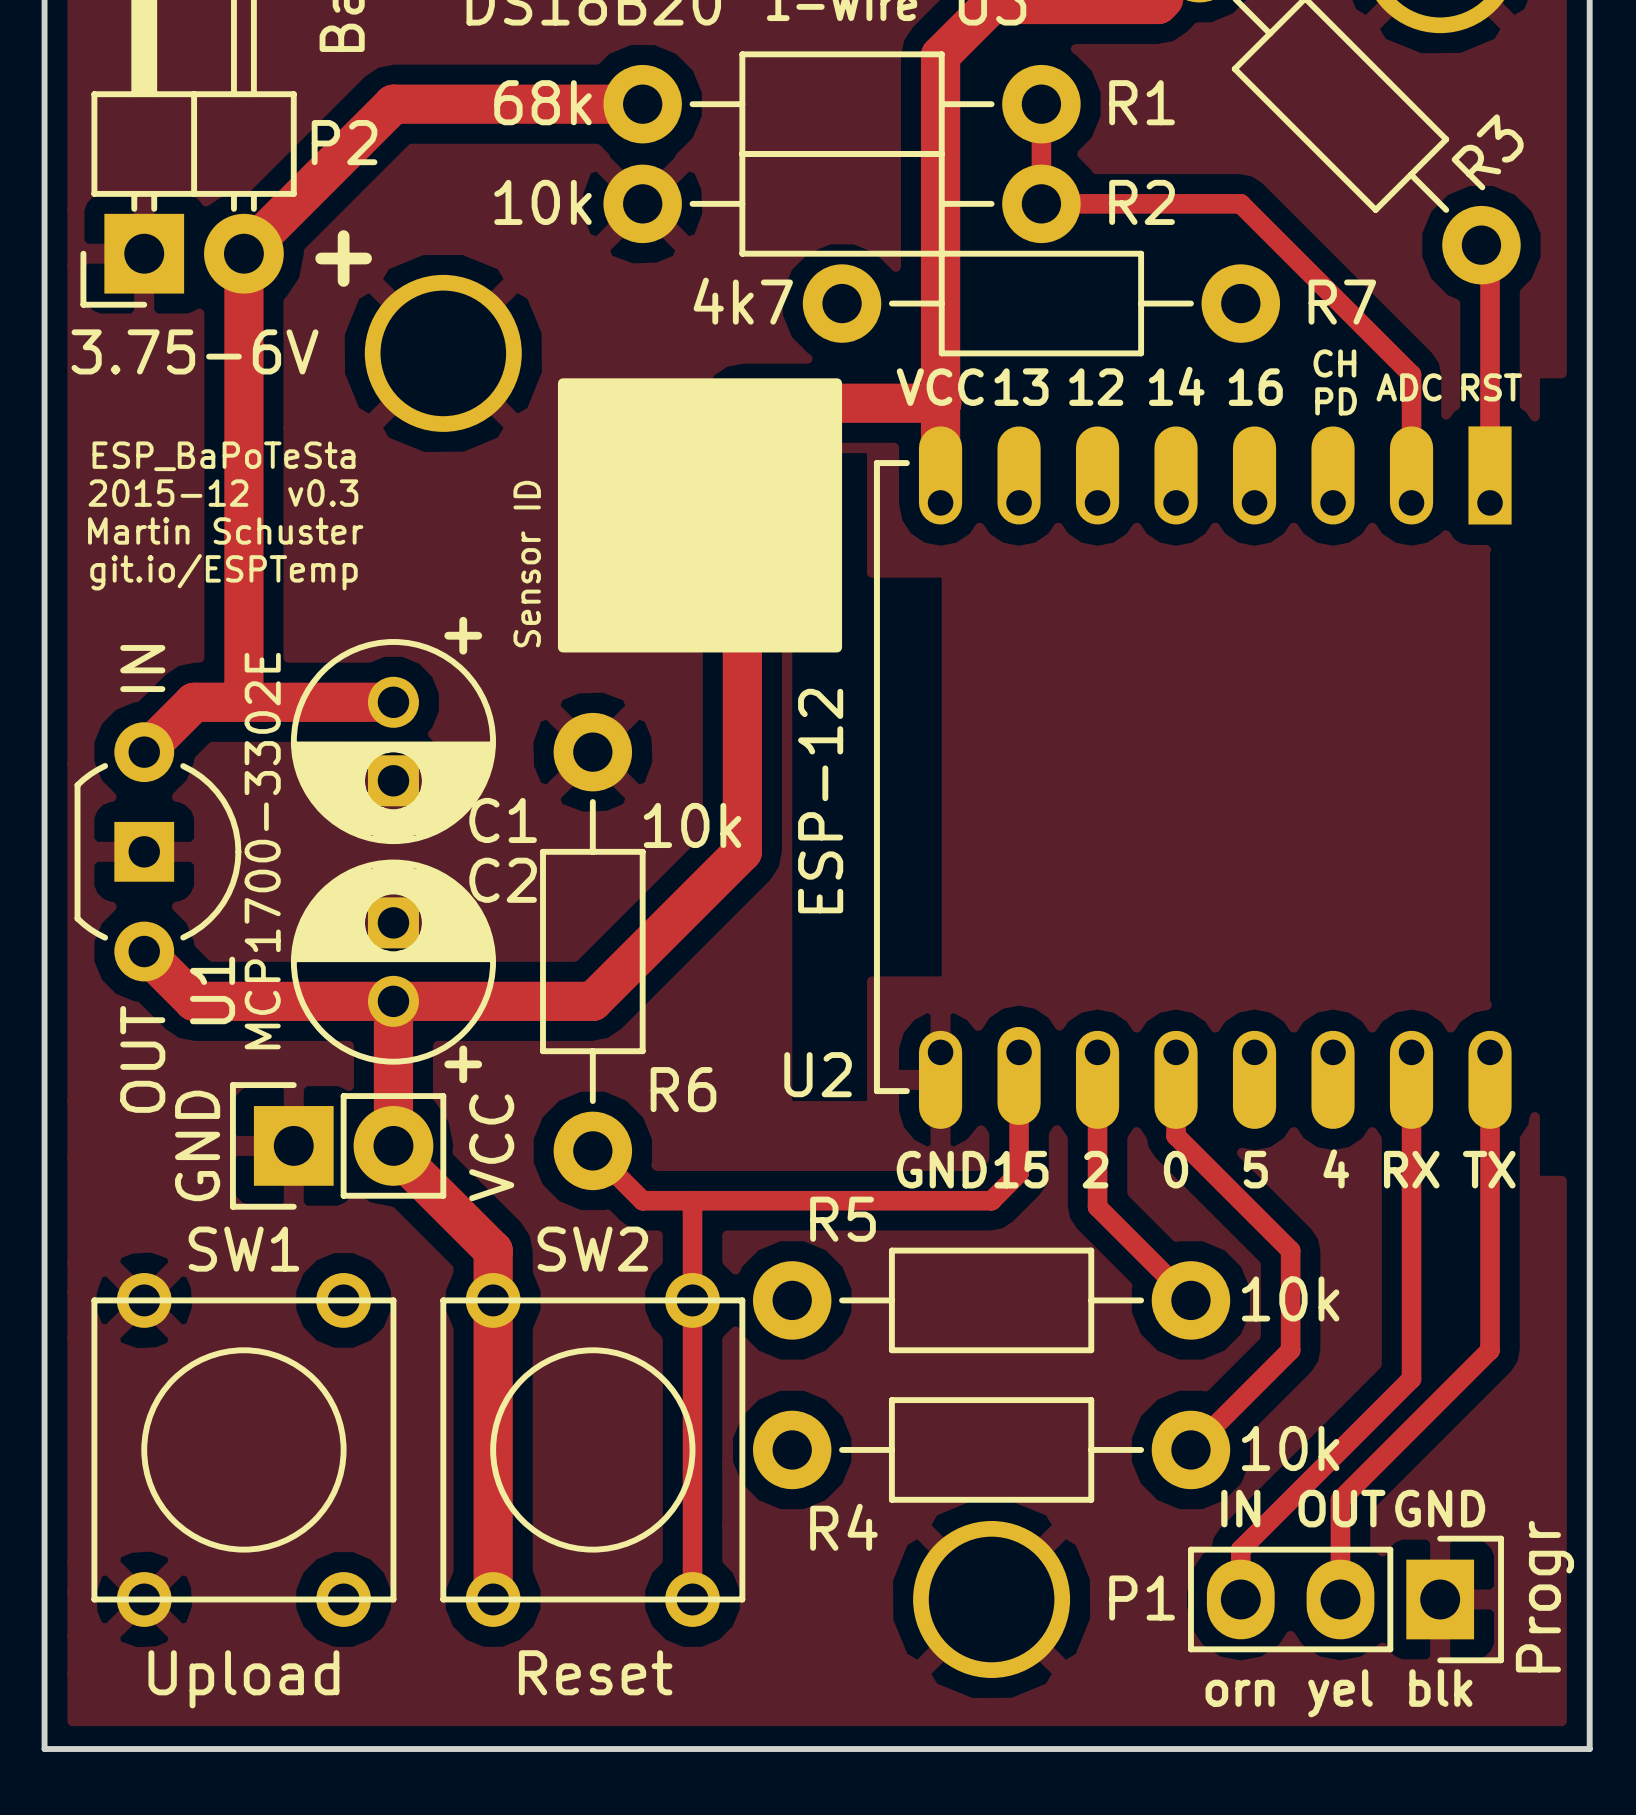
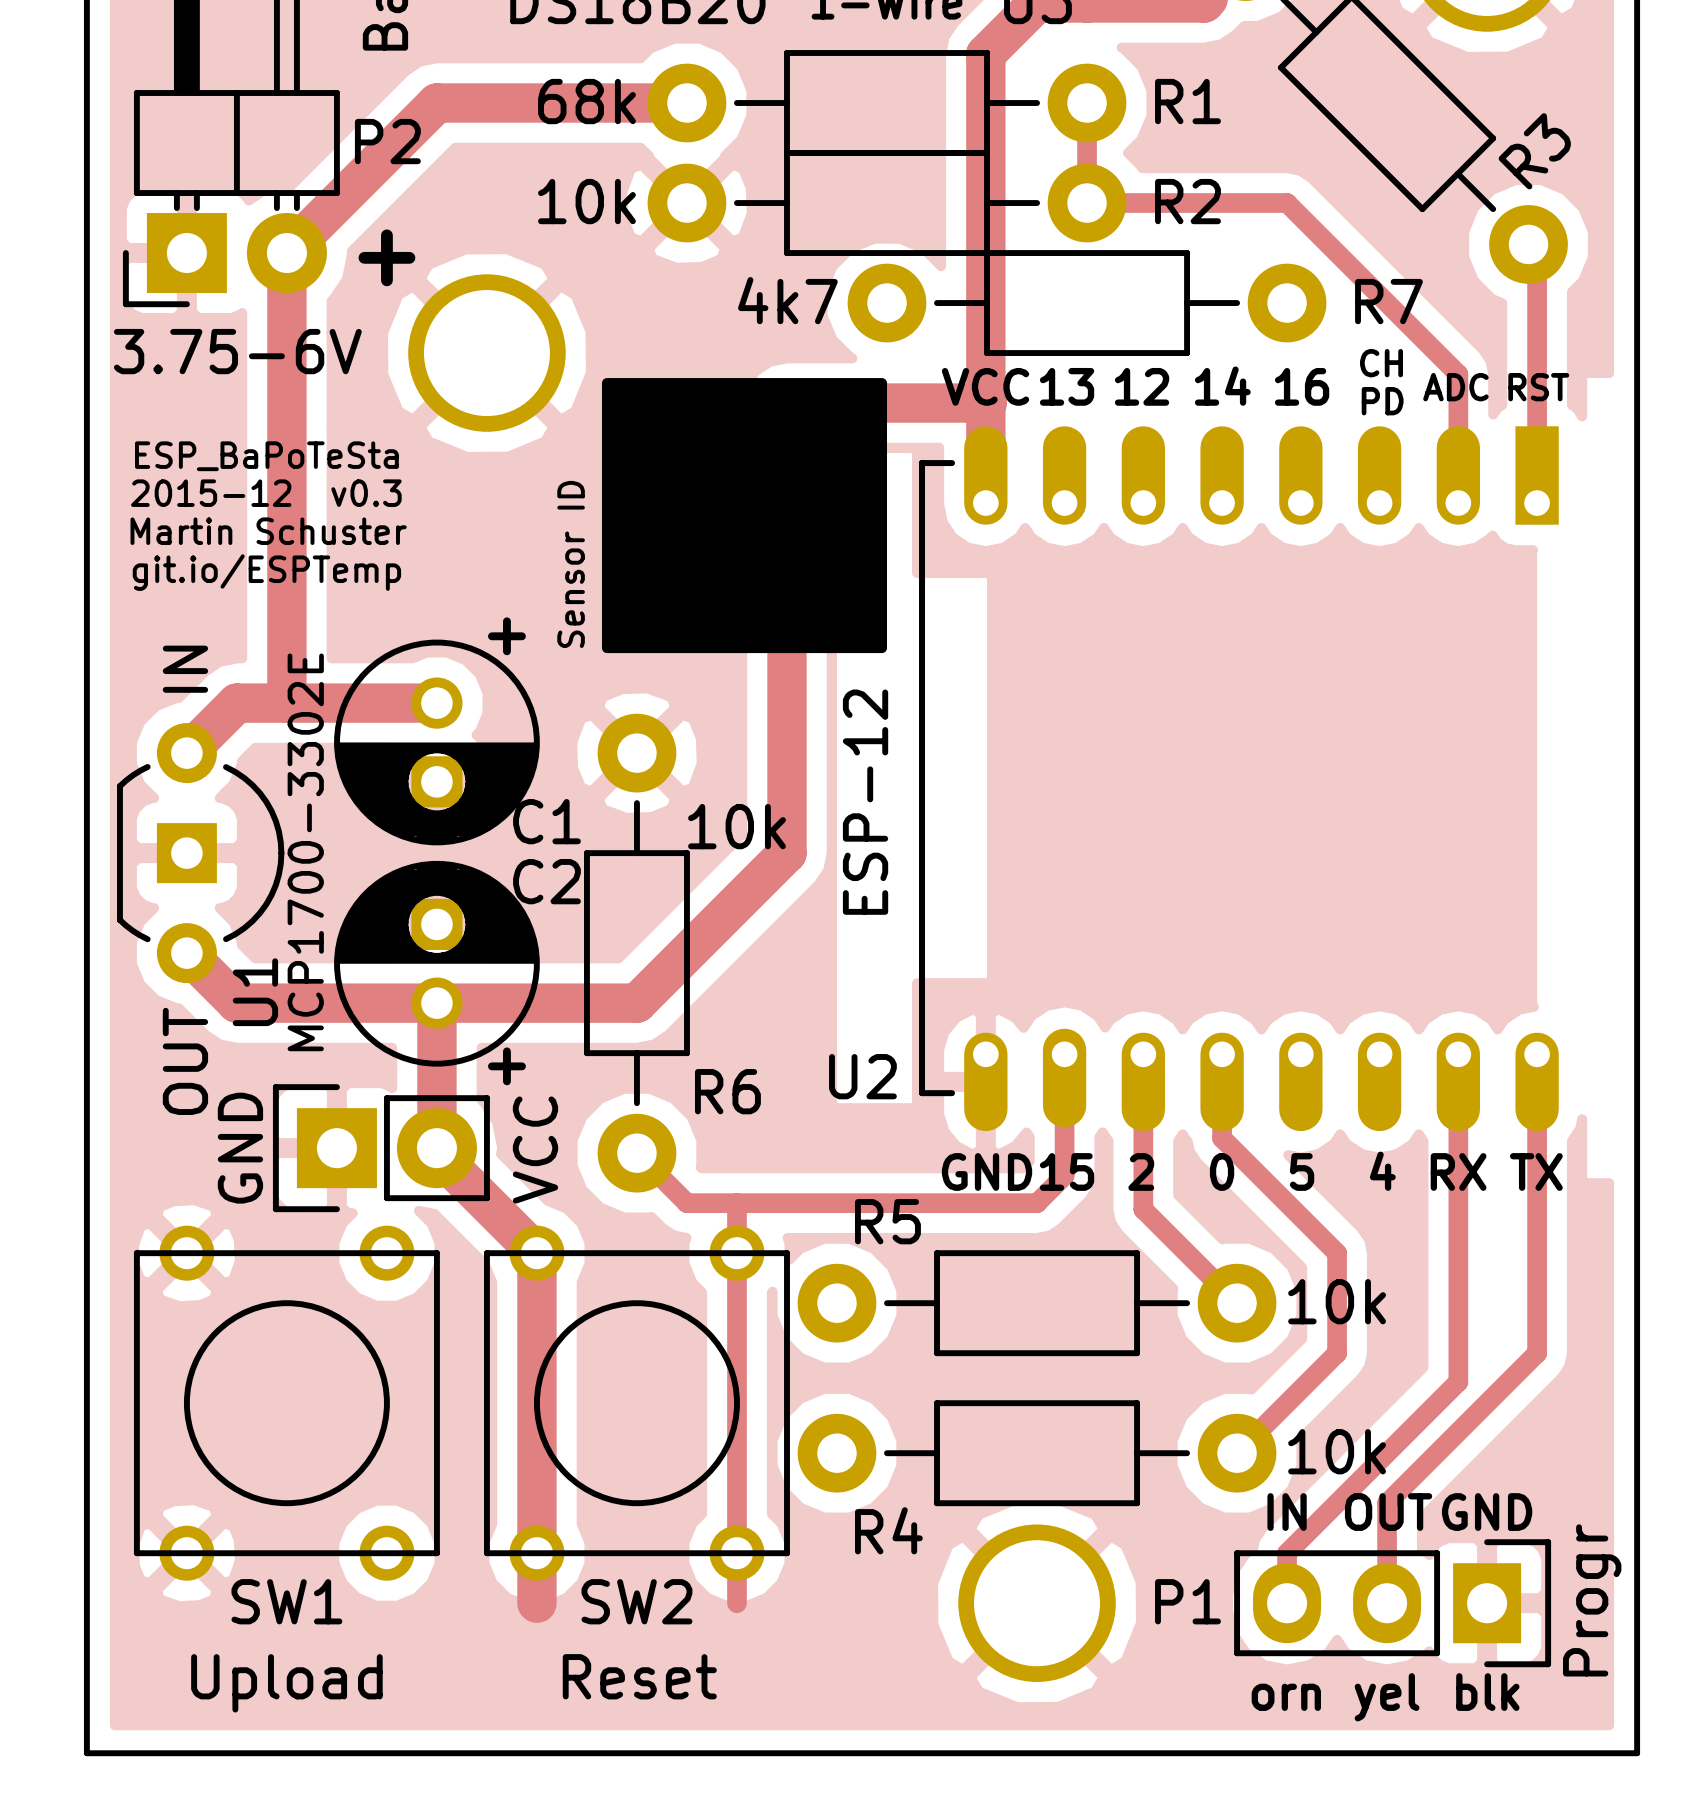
SW1 name position: SW1 (243, 1249) -> SW1 (286, 1601)
SW2 name position: SW2 (592, 1249) -> SW2 (636, 1601)
SW1 position: (243, 1449) -> (286, 1403)
SW2 position: (592, 1449) -> (636, 1403)

